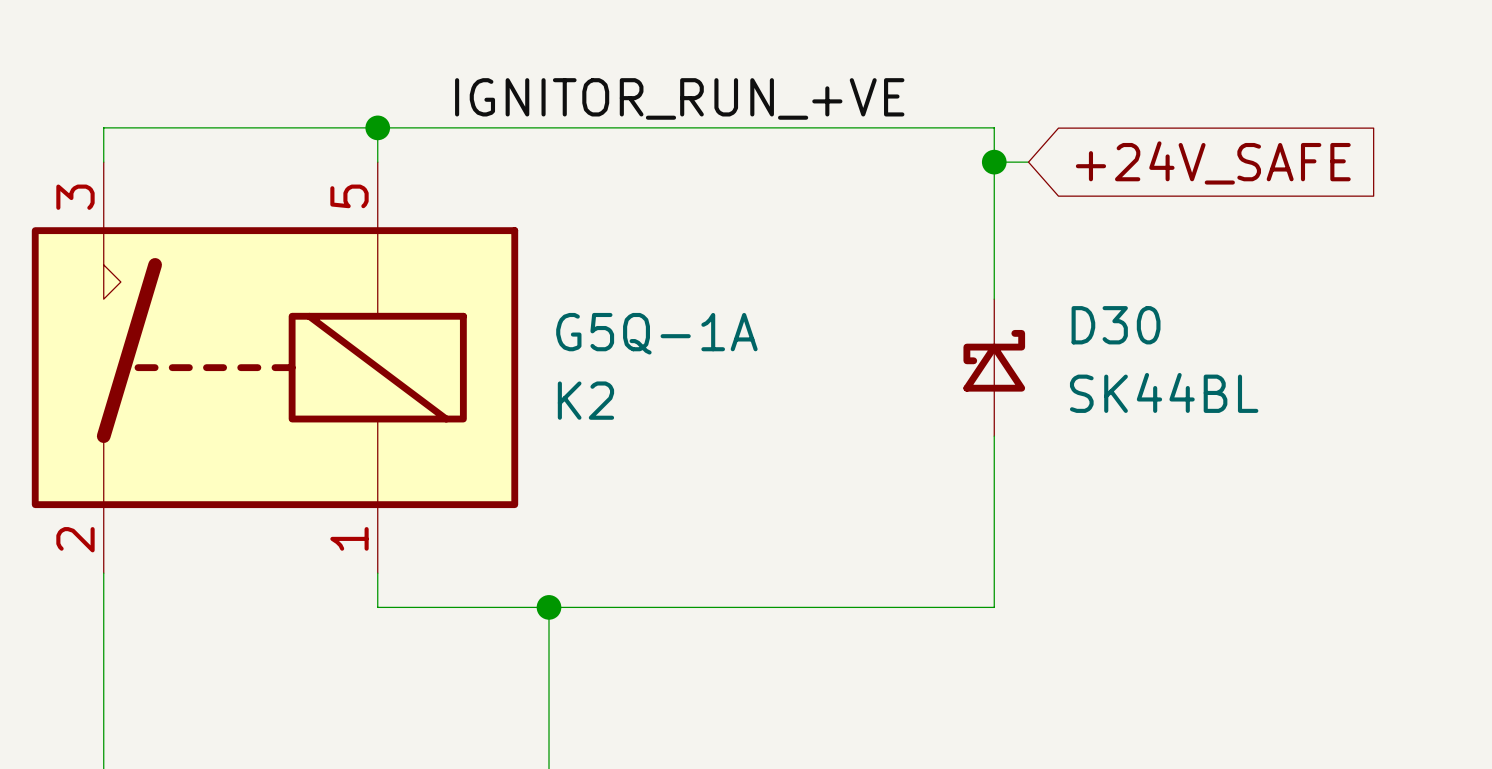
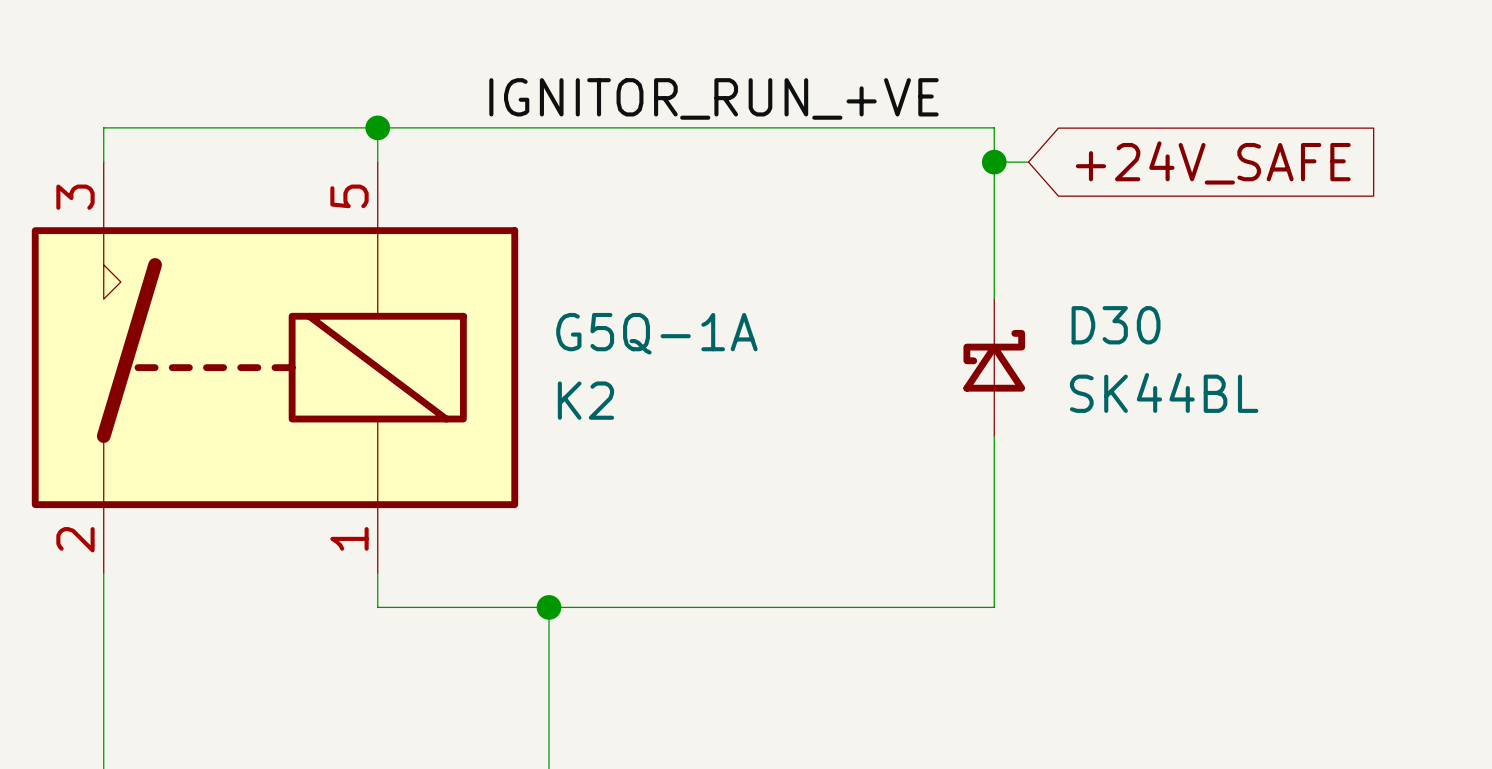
label position: IGNITOR_RUN_+VE (679, 98) -> IGNITOR_RUN_+VE (713, 98)

